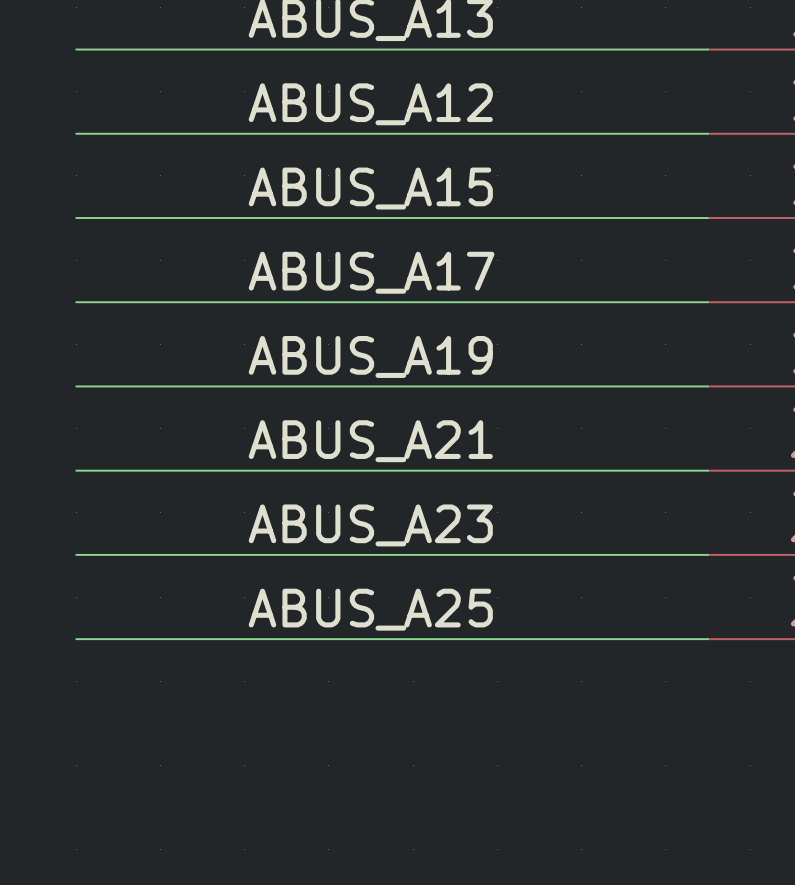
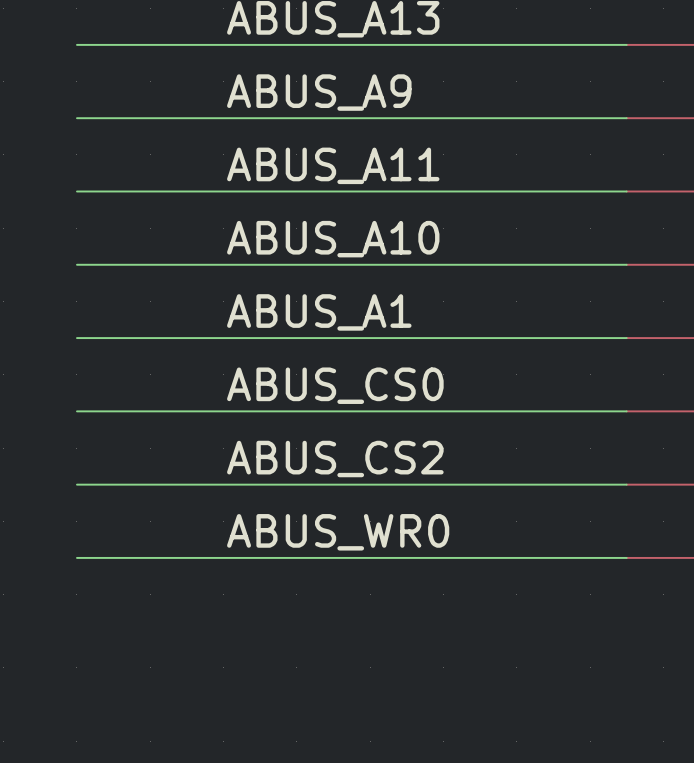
label: ABUS_A12 (370, 104) -> ABUS_A9 (319, 92)
label: ABUS_A15 (370, 188) -> ABUS_A11 (333, 165)
label: ABUS_A17 (371, 272) -> ABUS_A10 (333, 239)
label: ABUS_A19 (370, 356) -> ABUS_A1 (319, 312)
label: ABUS_A21 (370, 441) -> ABUS_CS0 (335, 385)
label: ABUS_A23 (370, 525) -> ABUS_CS2 (335, 459)
label: ABUS_A25 (370, 609) -> ABUS_WR0 (338, 532)

